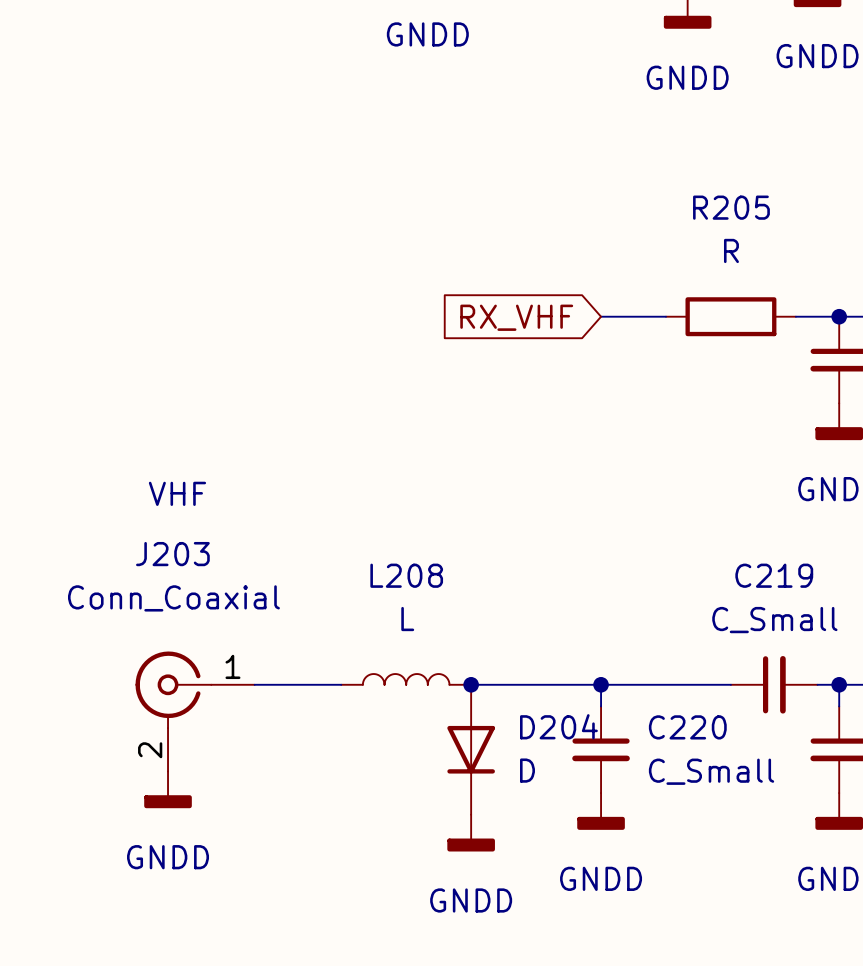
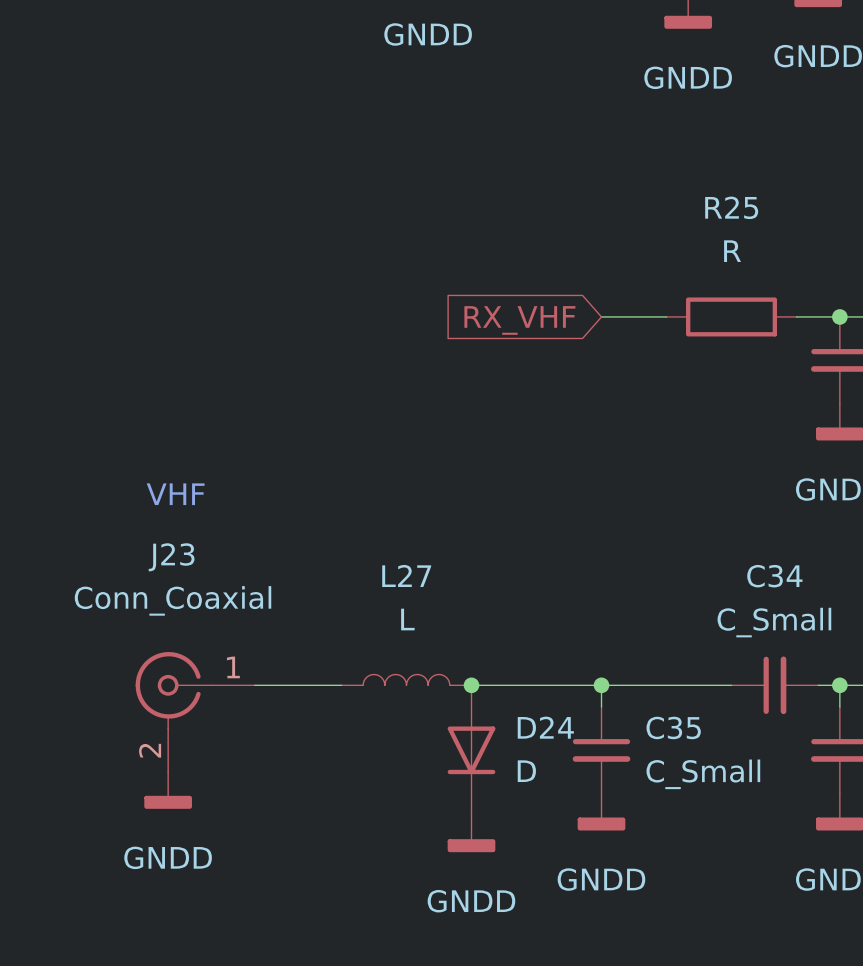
R205 name: R205 (731, 207) -> R25 (731, 207)
J203 name: J203 (172, 554) -> J23 (171, 557)
L208 name: L208 (406, 575) -> L27 (406, 575)
C219 name: C219 (774, 575) -> C34 (774, 576)
D204 name: D204 (558, 726) -> D24 (545, 727)
C220 name: C220 (687, 727) -> C35 (673, 727)

